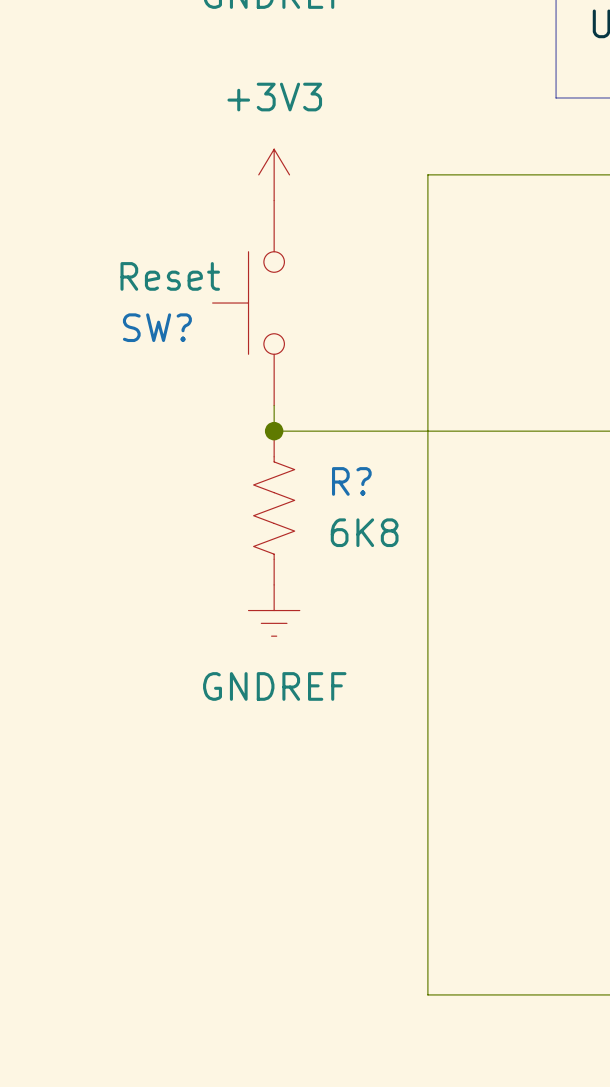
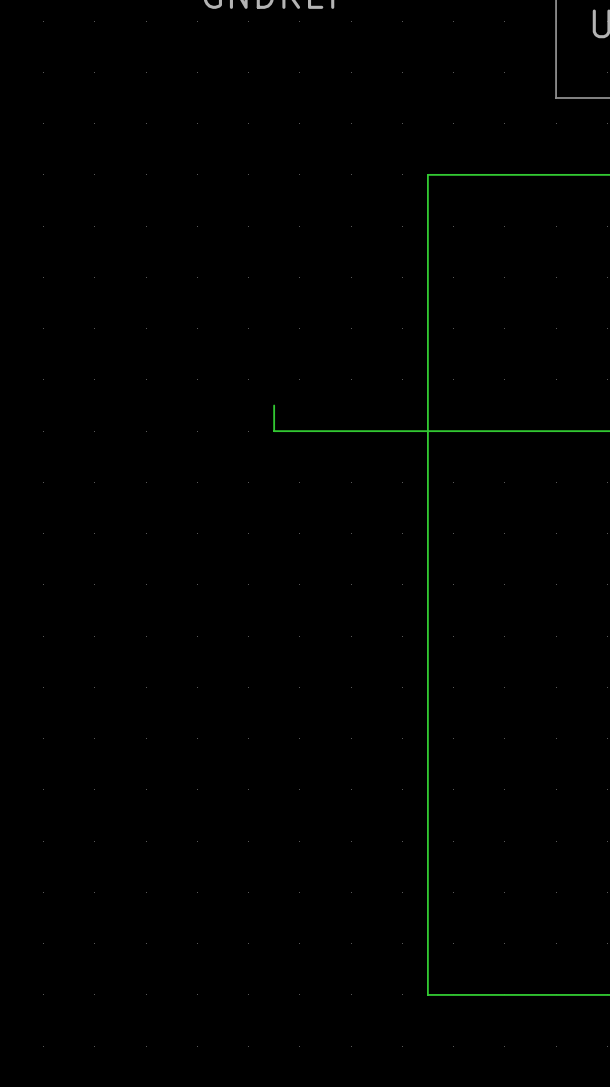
power symbol: +3V3 (274, 174) -> none
SW?: Reset (248, 303) -> none
junction: (274, 431) -> none
R?: 6K8 (274, 508) -> none
power symbol: GNDREF (274, 610) -> none

